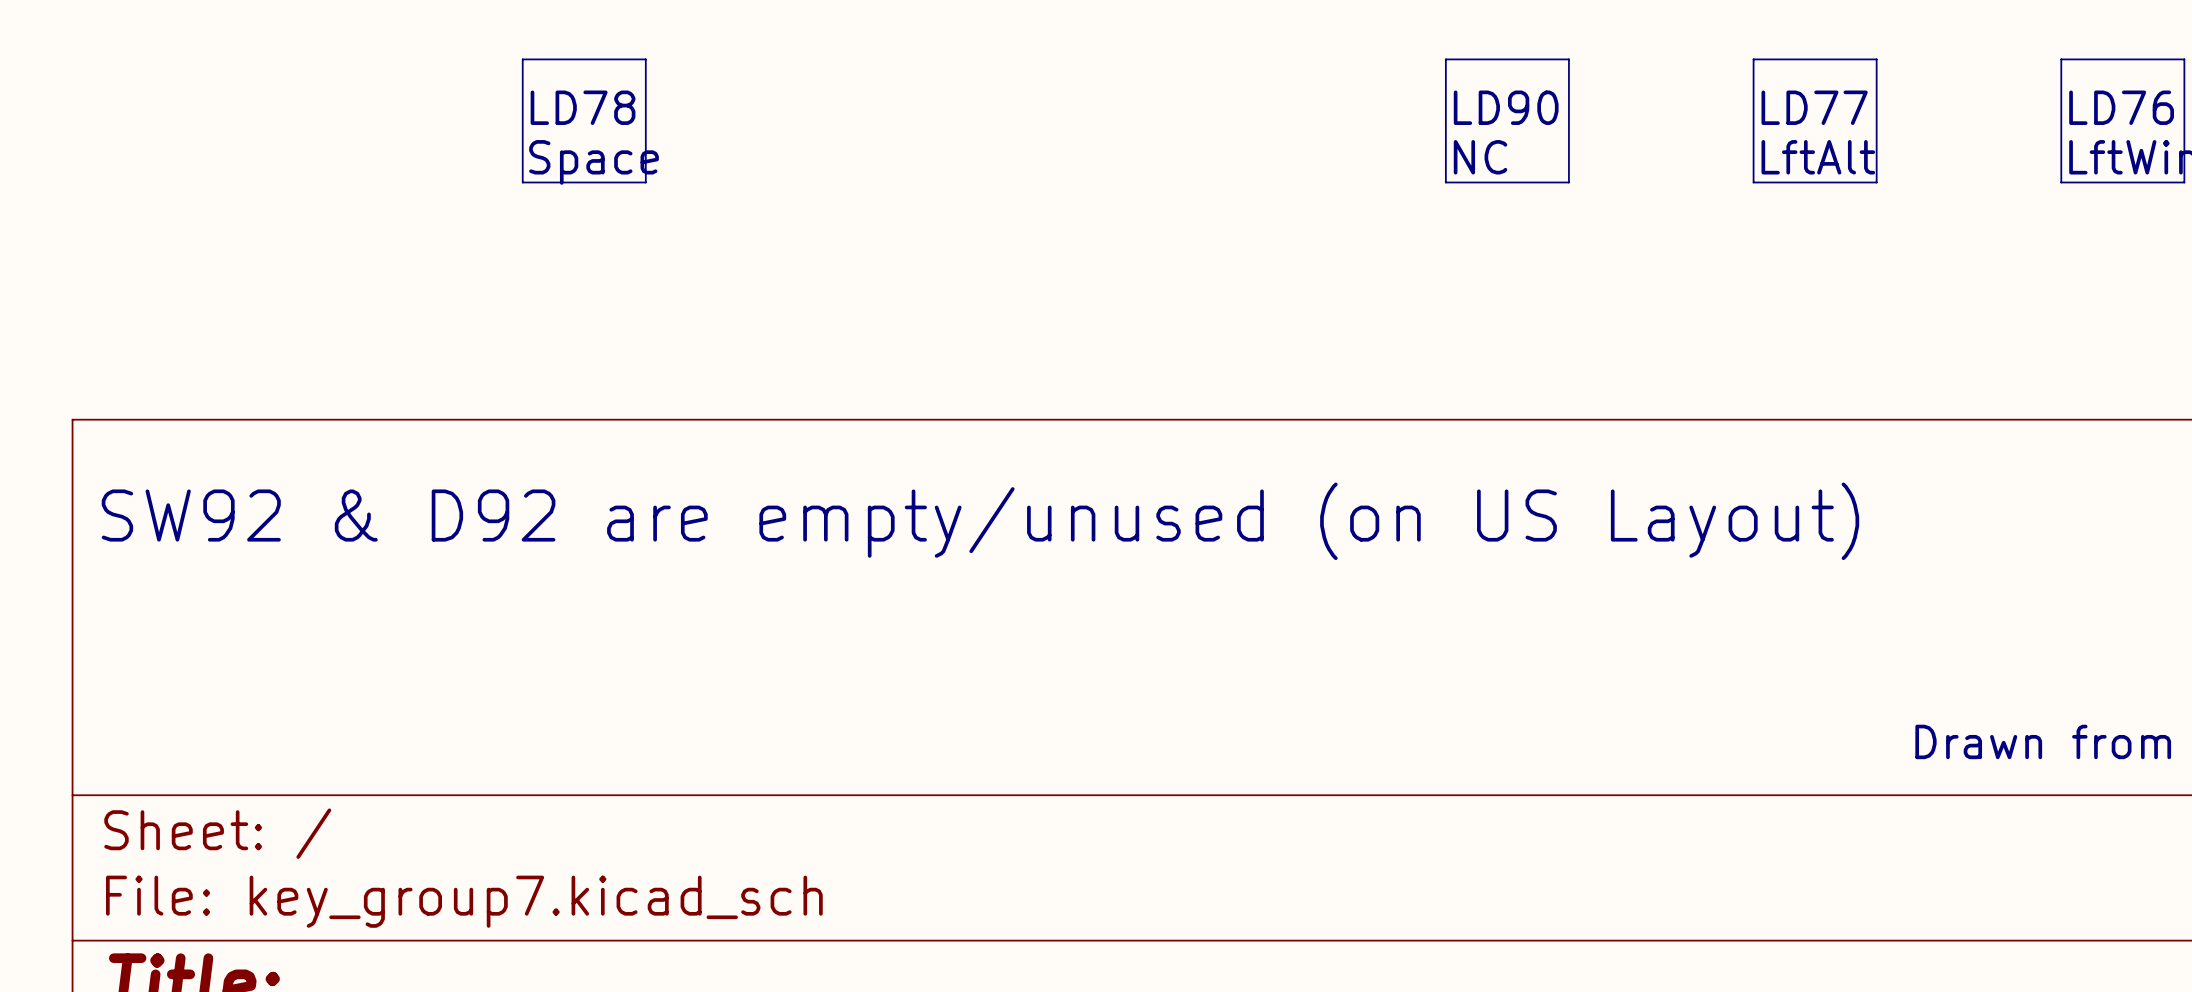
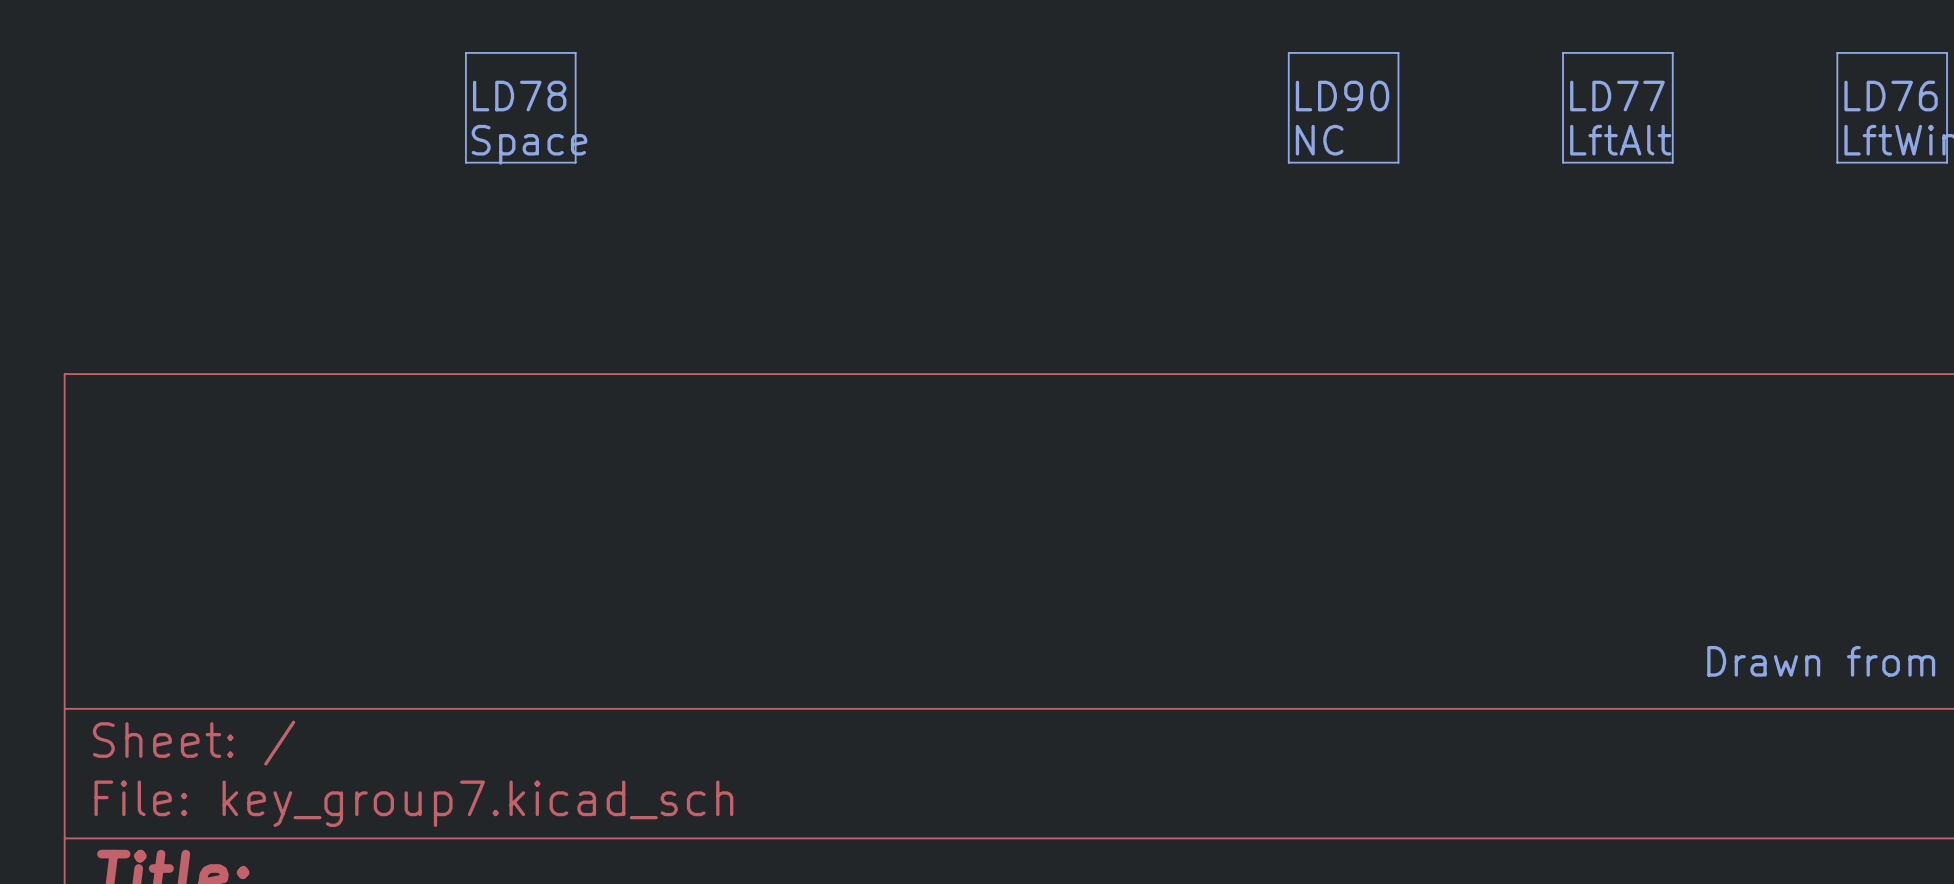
text: SW92 & D92 are empty/unused (on US Layout) (980, 521) -> none

